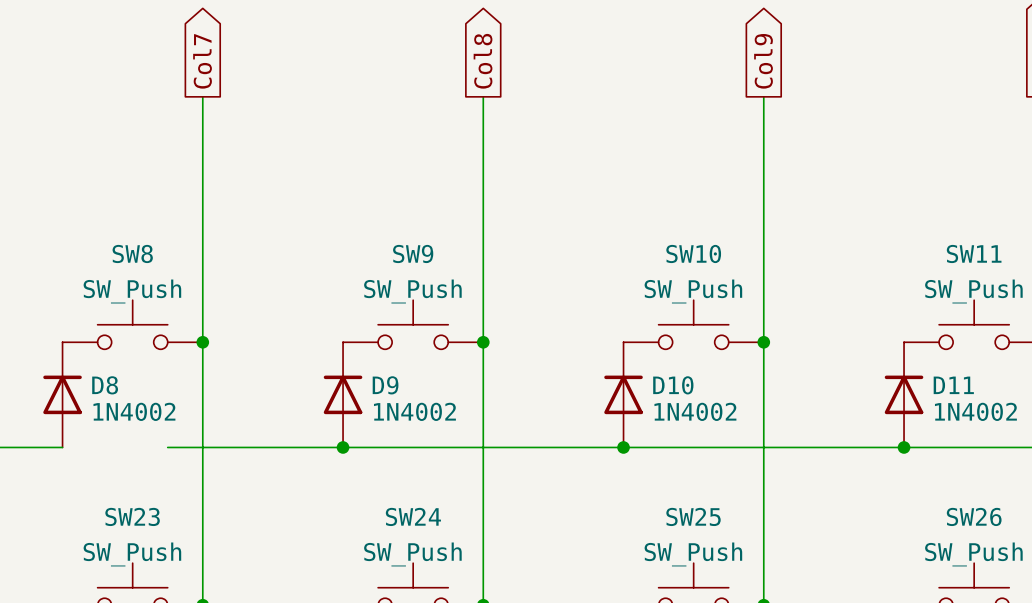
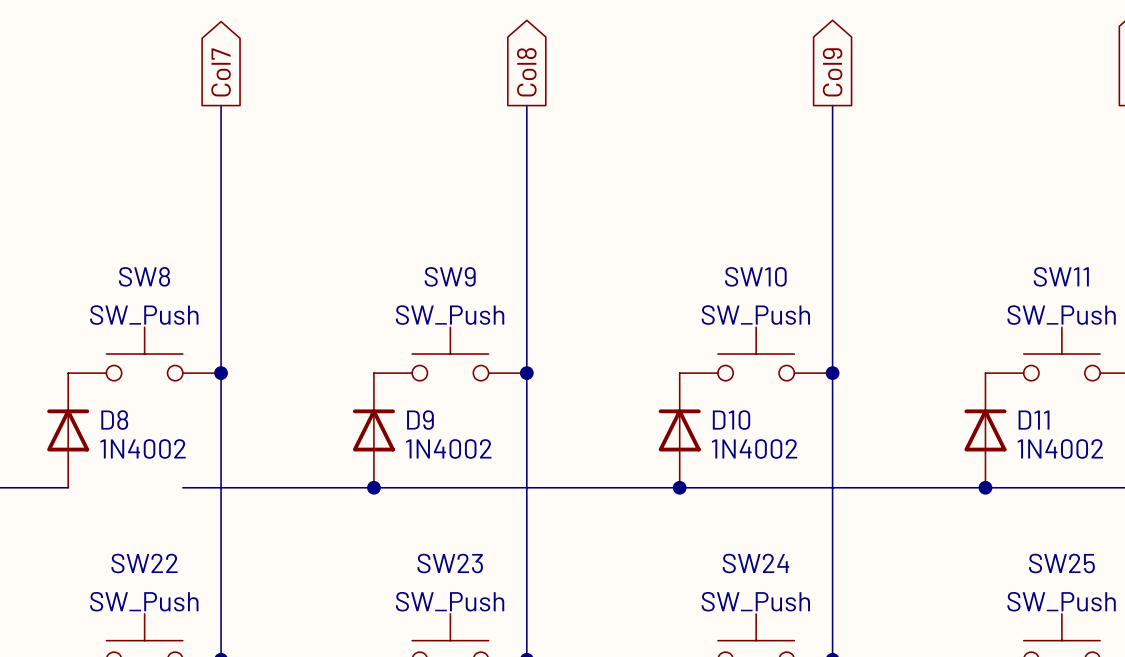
SW23 name: SW23 (132, 516) -> SW22 (144, 563)
SW24 name: SW24 (413, 516) -> SW23 (450, 563)
SW25 name: SW25 (693, 516) -> SW24 (756, 563)
SW26 name: SW26 (974, 516) -> SW25 (1061, 563)

